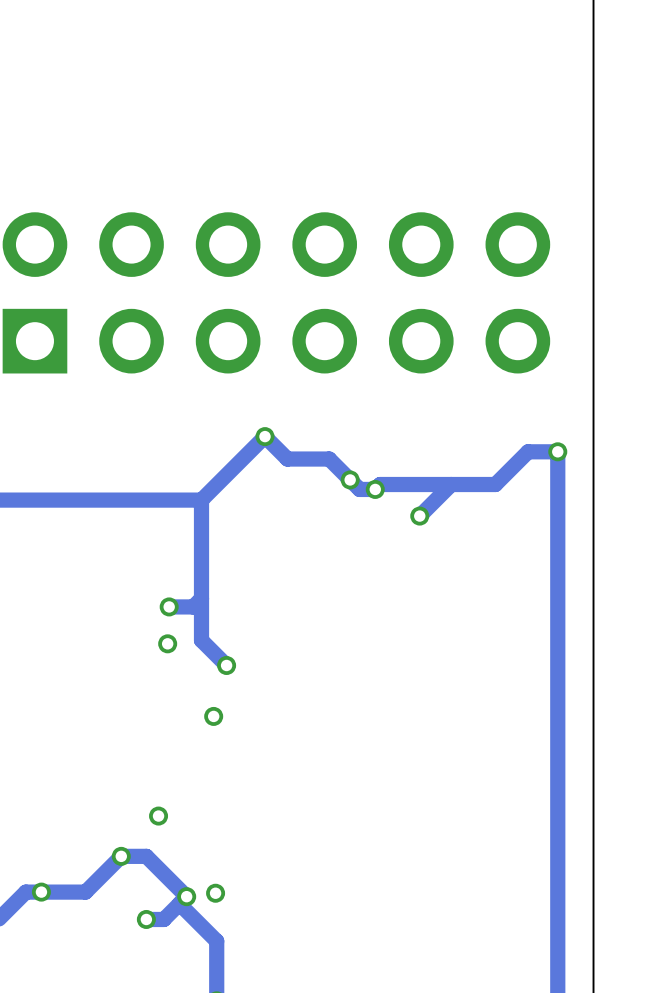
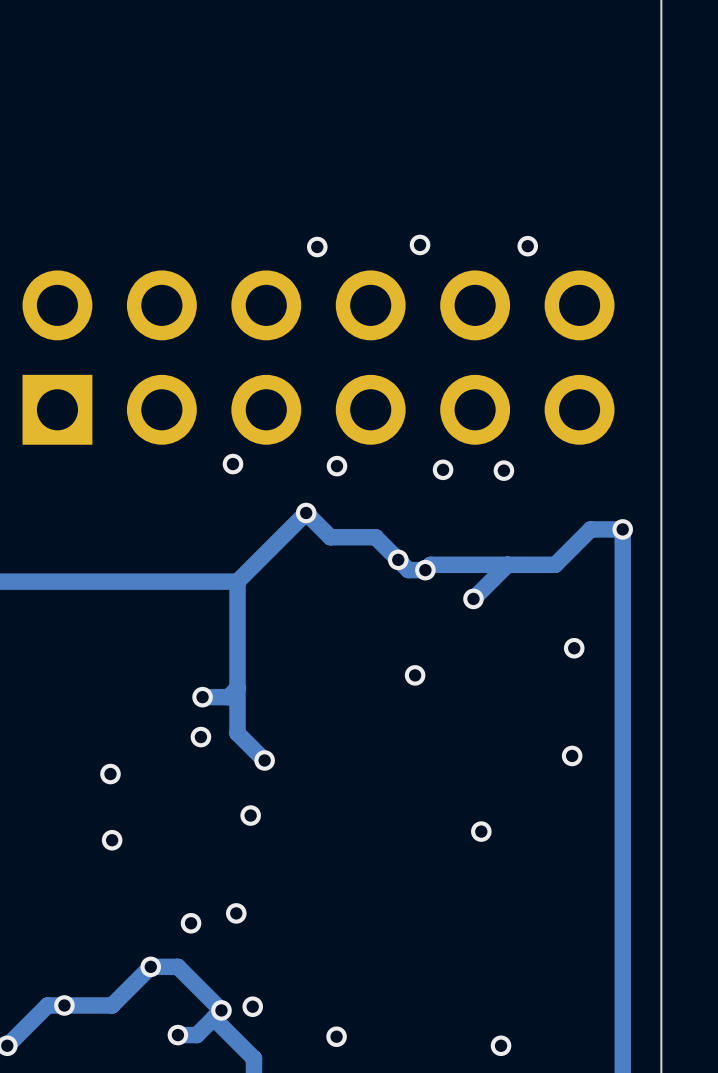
via: none -> (420, 244)
via: none -> (527, 246)
via: none -> (317, 247)
via: none -> (232, 464)
via: none -> (337, 466)
via: none -> (443, 469)
via: none -> (503, 470)
via: none -> (574, 648)
via: none -> (415, 675)
via: none -> (572, 755)
via: none -> (110, 774)
via: none -> (481, 831)
via: none -> (112, 840)
via: none -> (236, 913)
via: none -> (336, 1036)
via: none -> (501, 1045)

